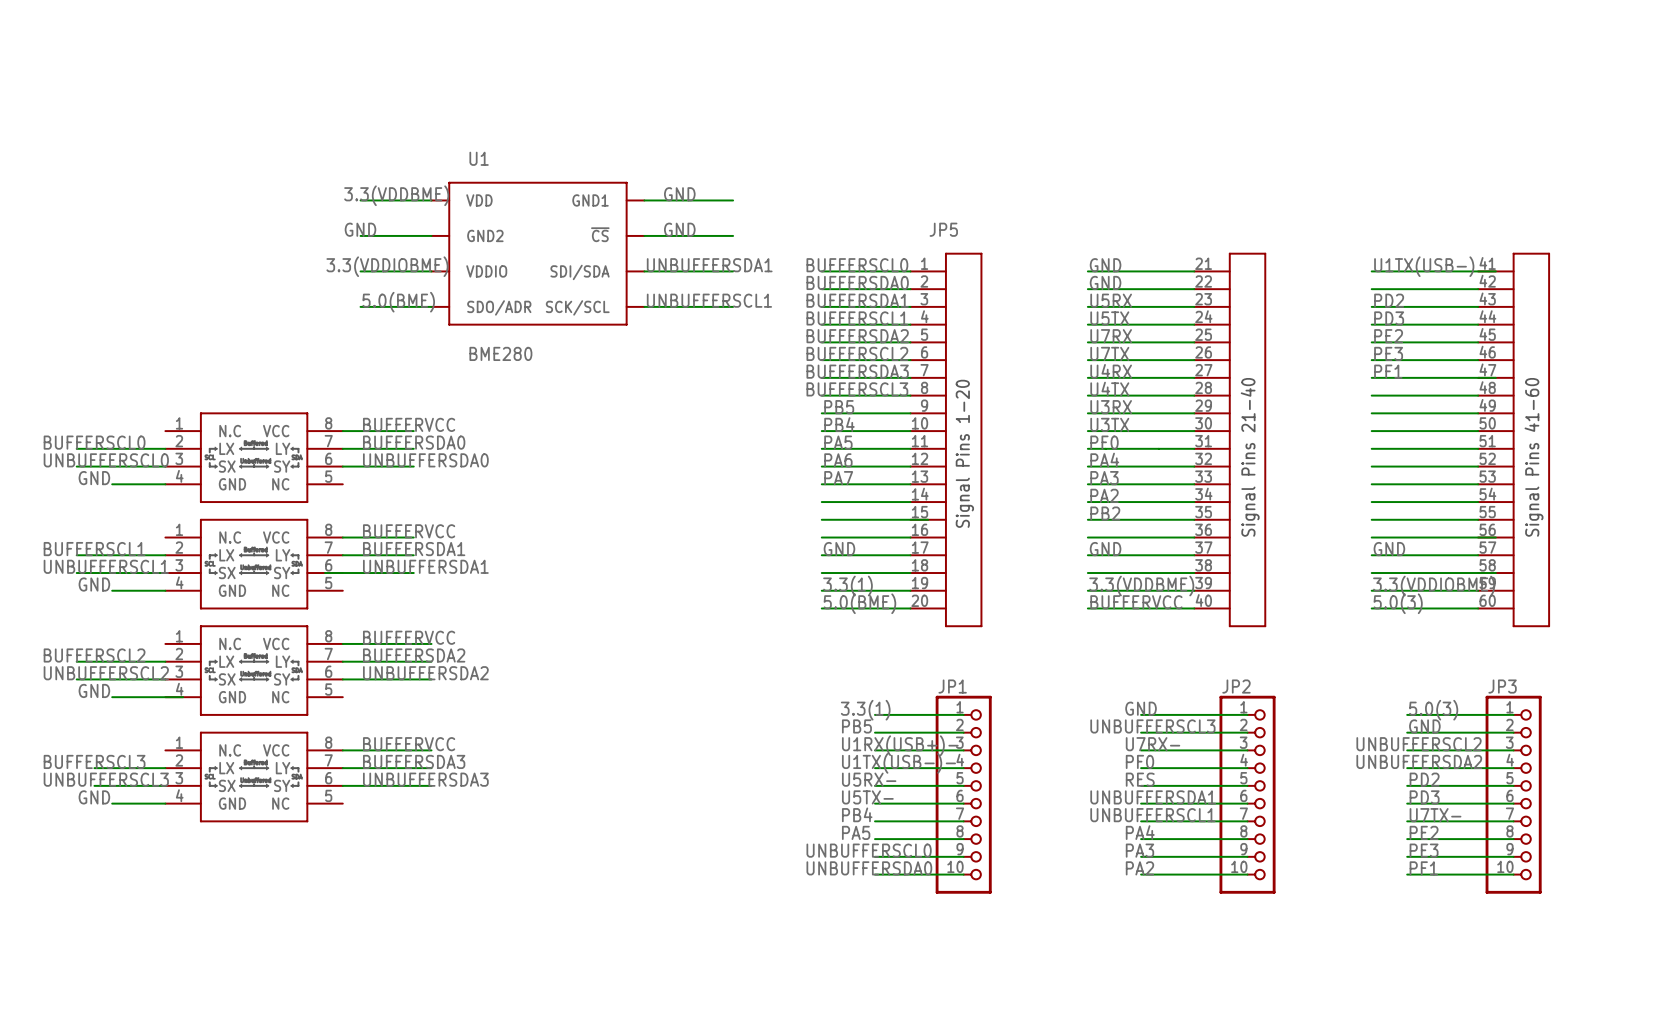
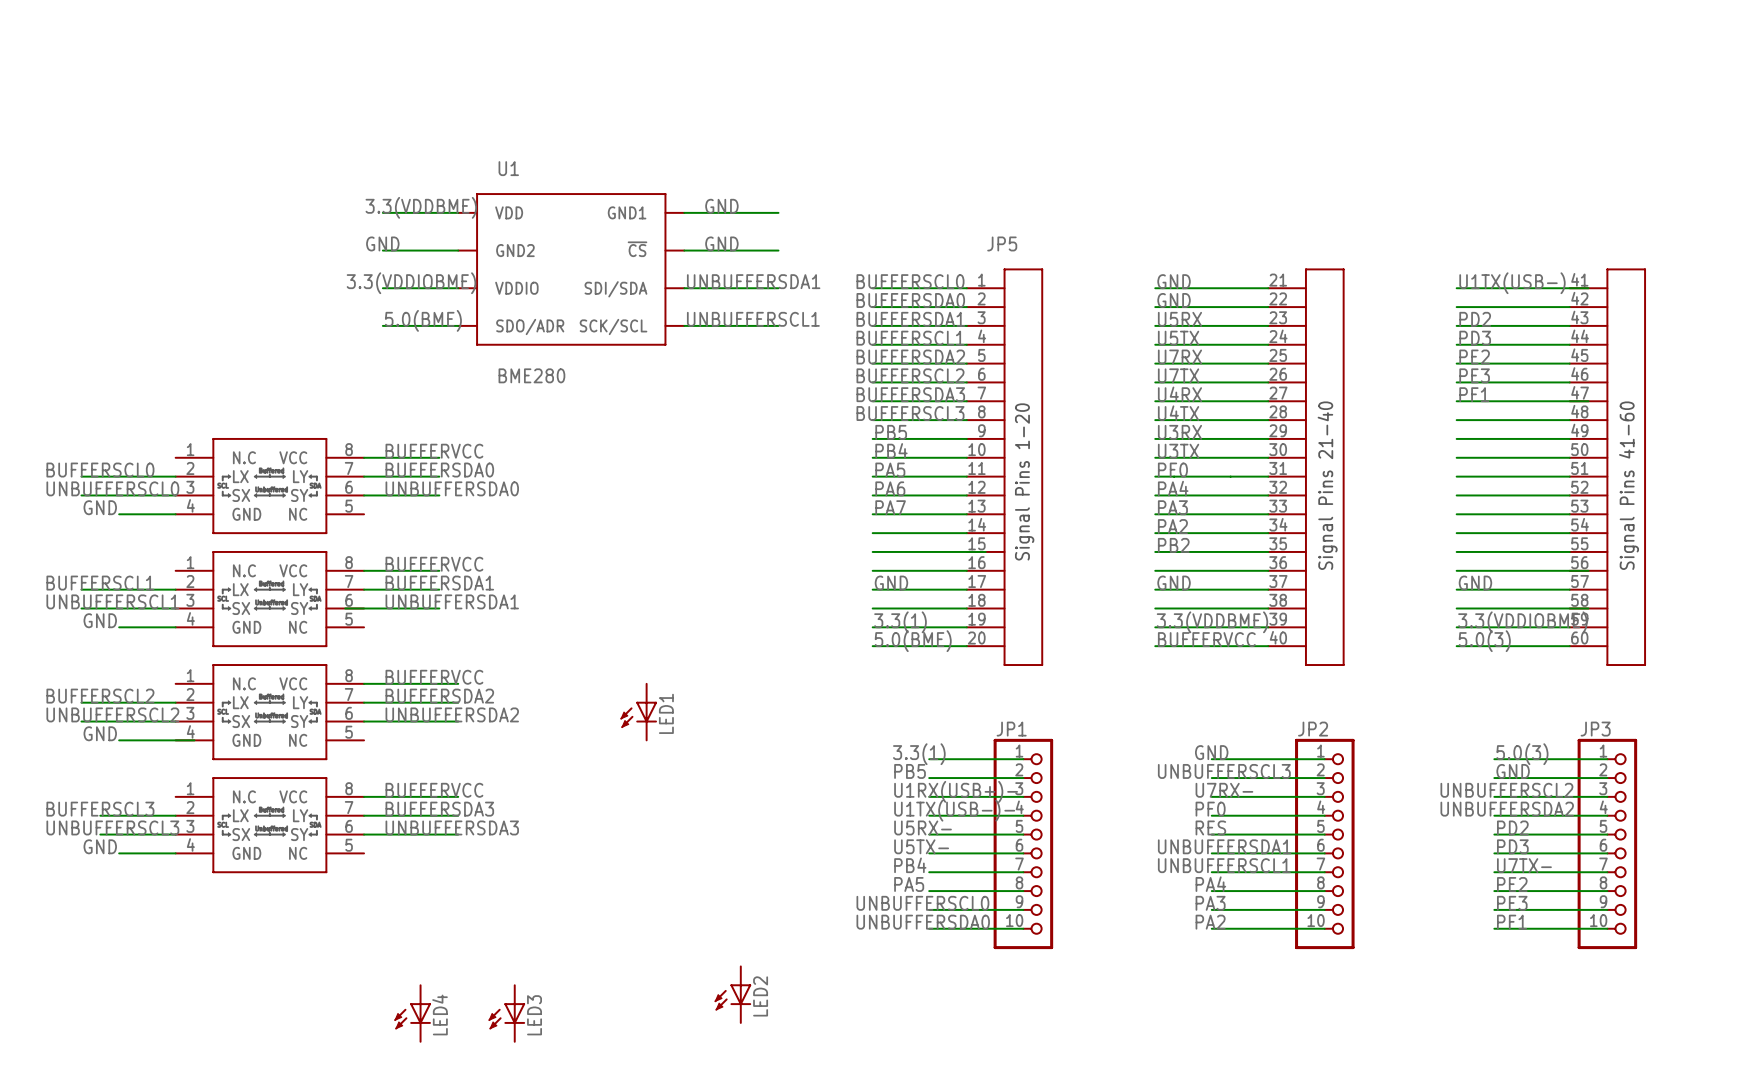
LED1: none -> (638, 712)
LED2: none -> (732, 994)
LED4: none -> (412, 1013)
LED3: none -> (506, 1013)

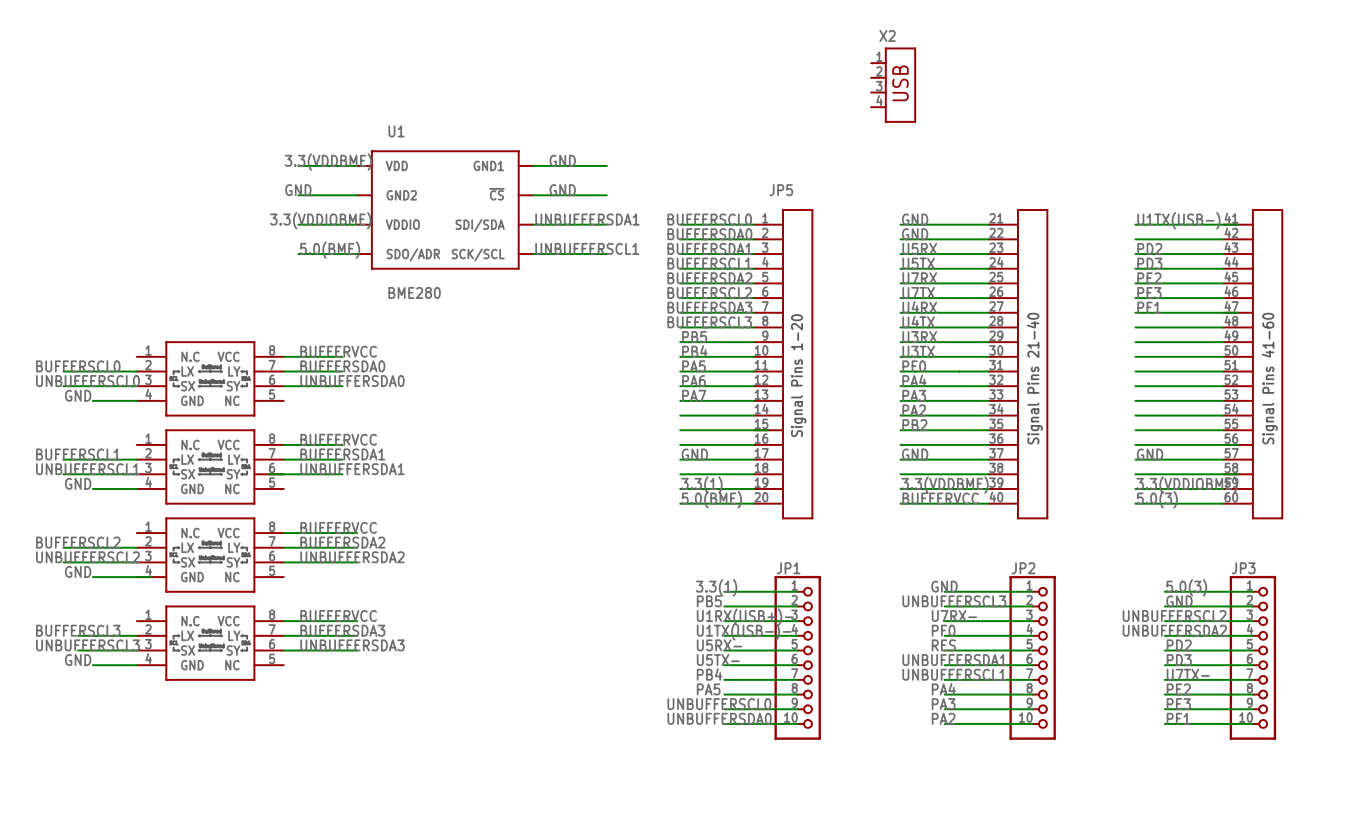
X2: none -> (893, 85)
LED1: (638, 712) -> none
LED2: (732, 994) -> none
LED4: (412, 1013) -> none
LED3: (506, 1013) -> none

